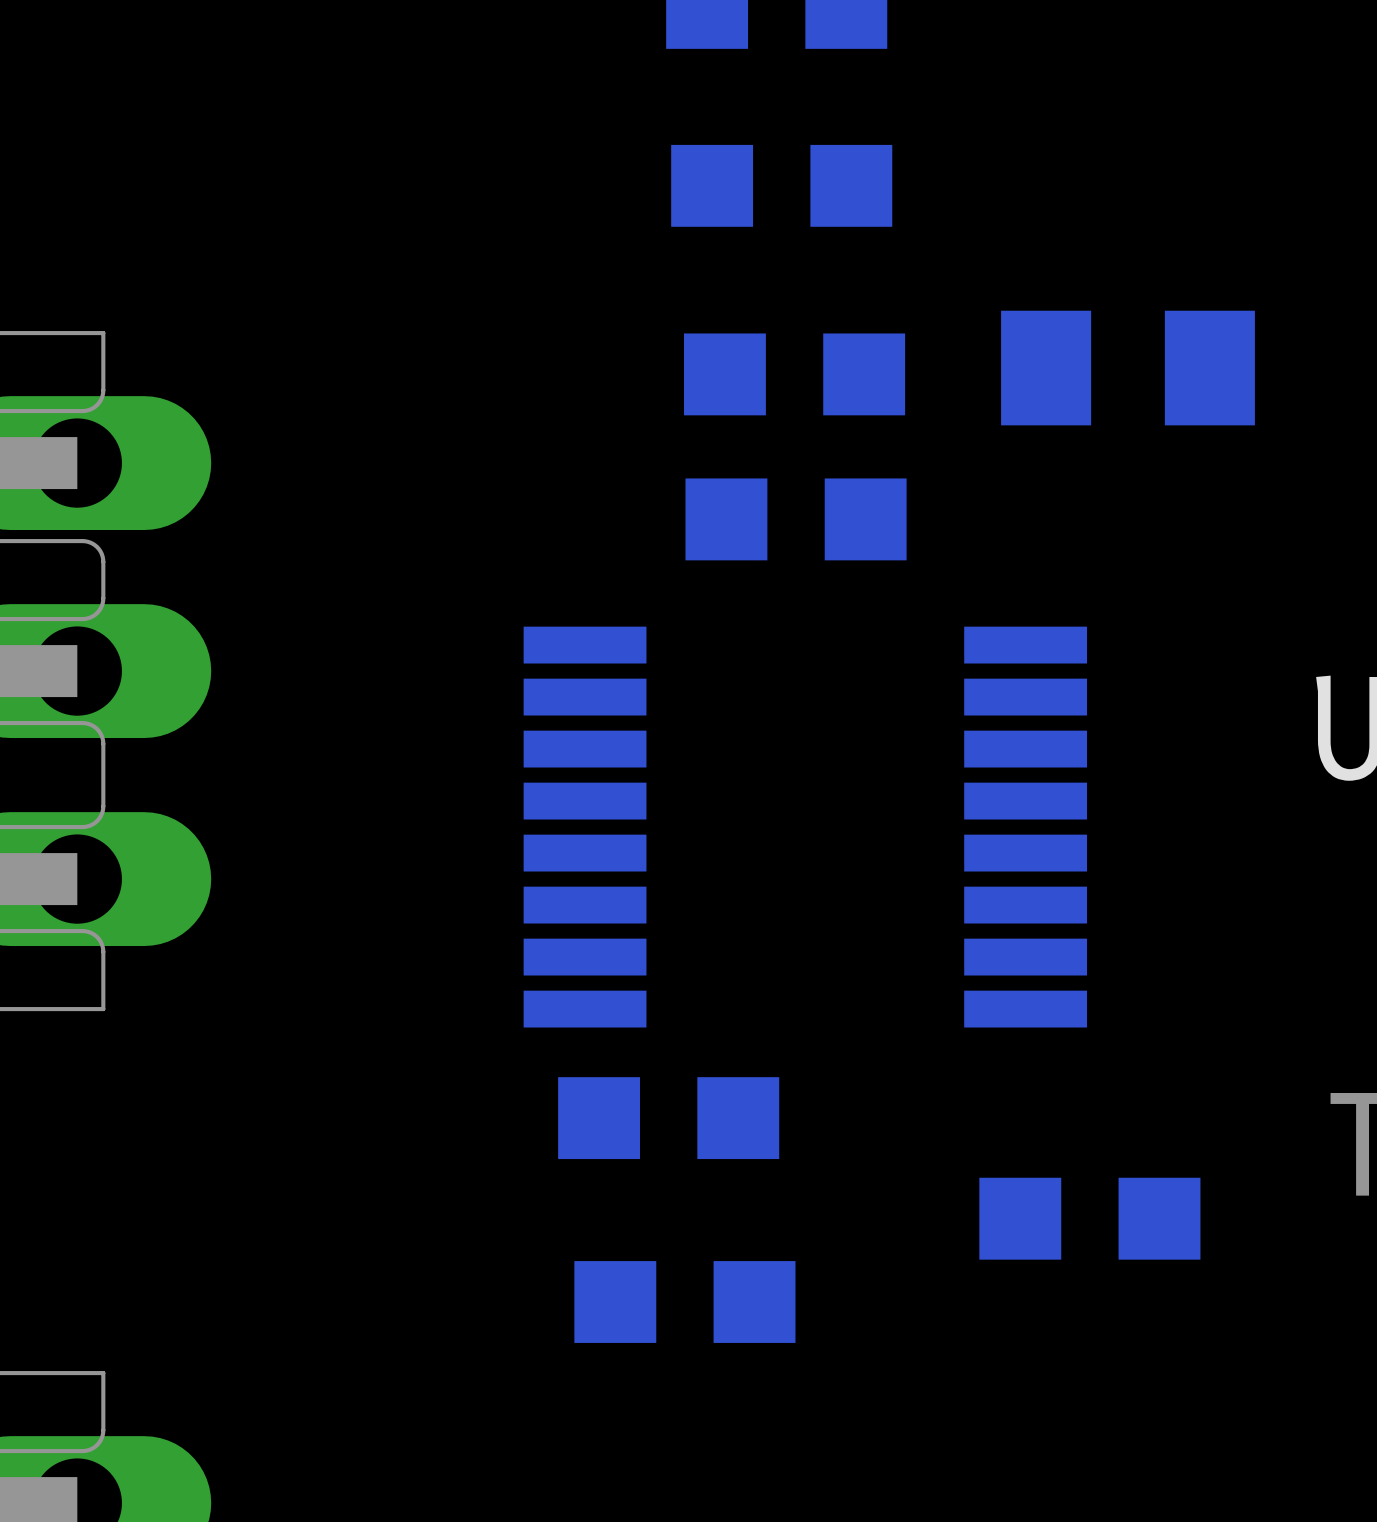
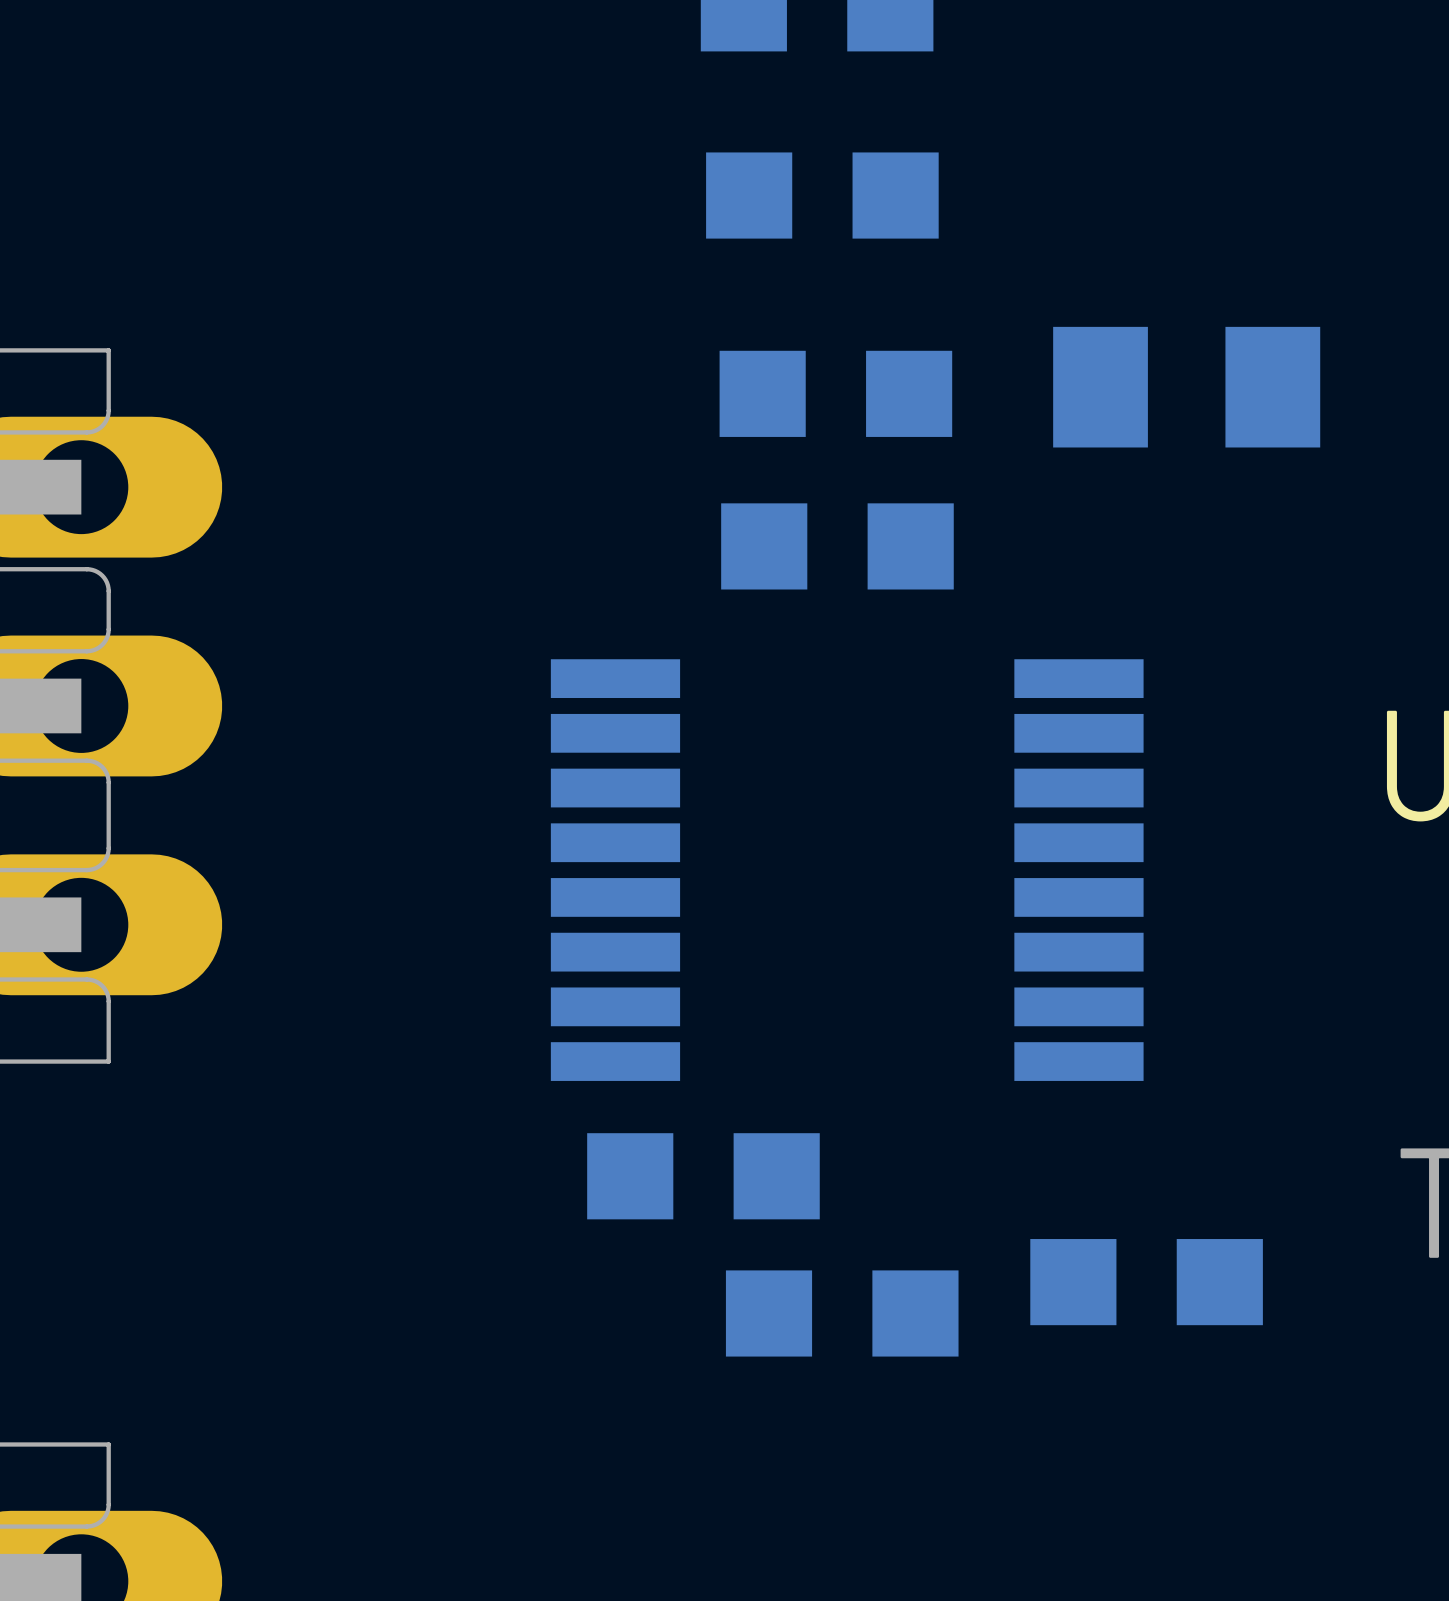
part position: (684, 1302) -> (842, 1313)

